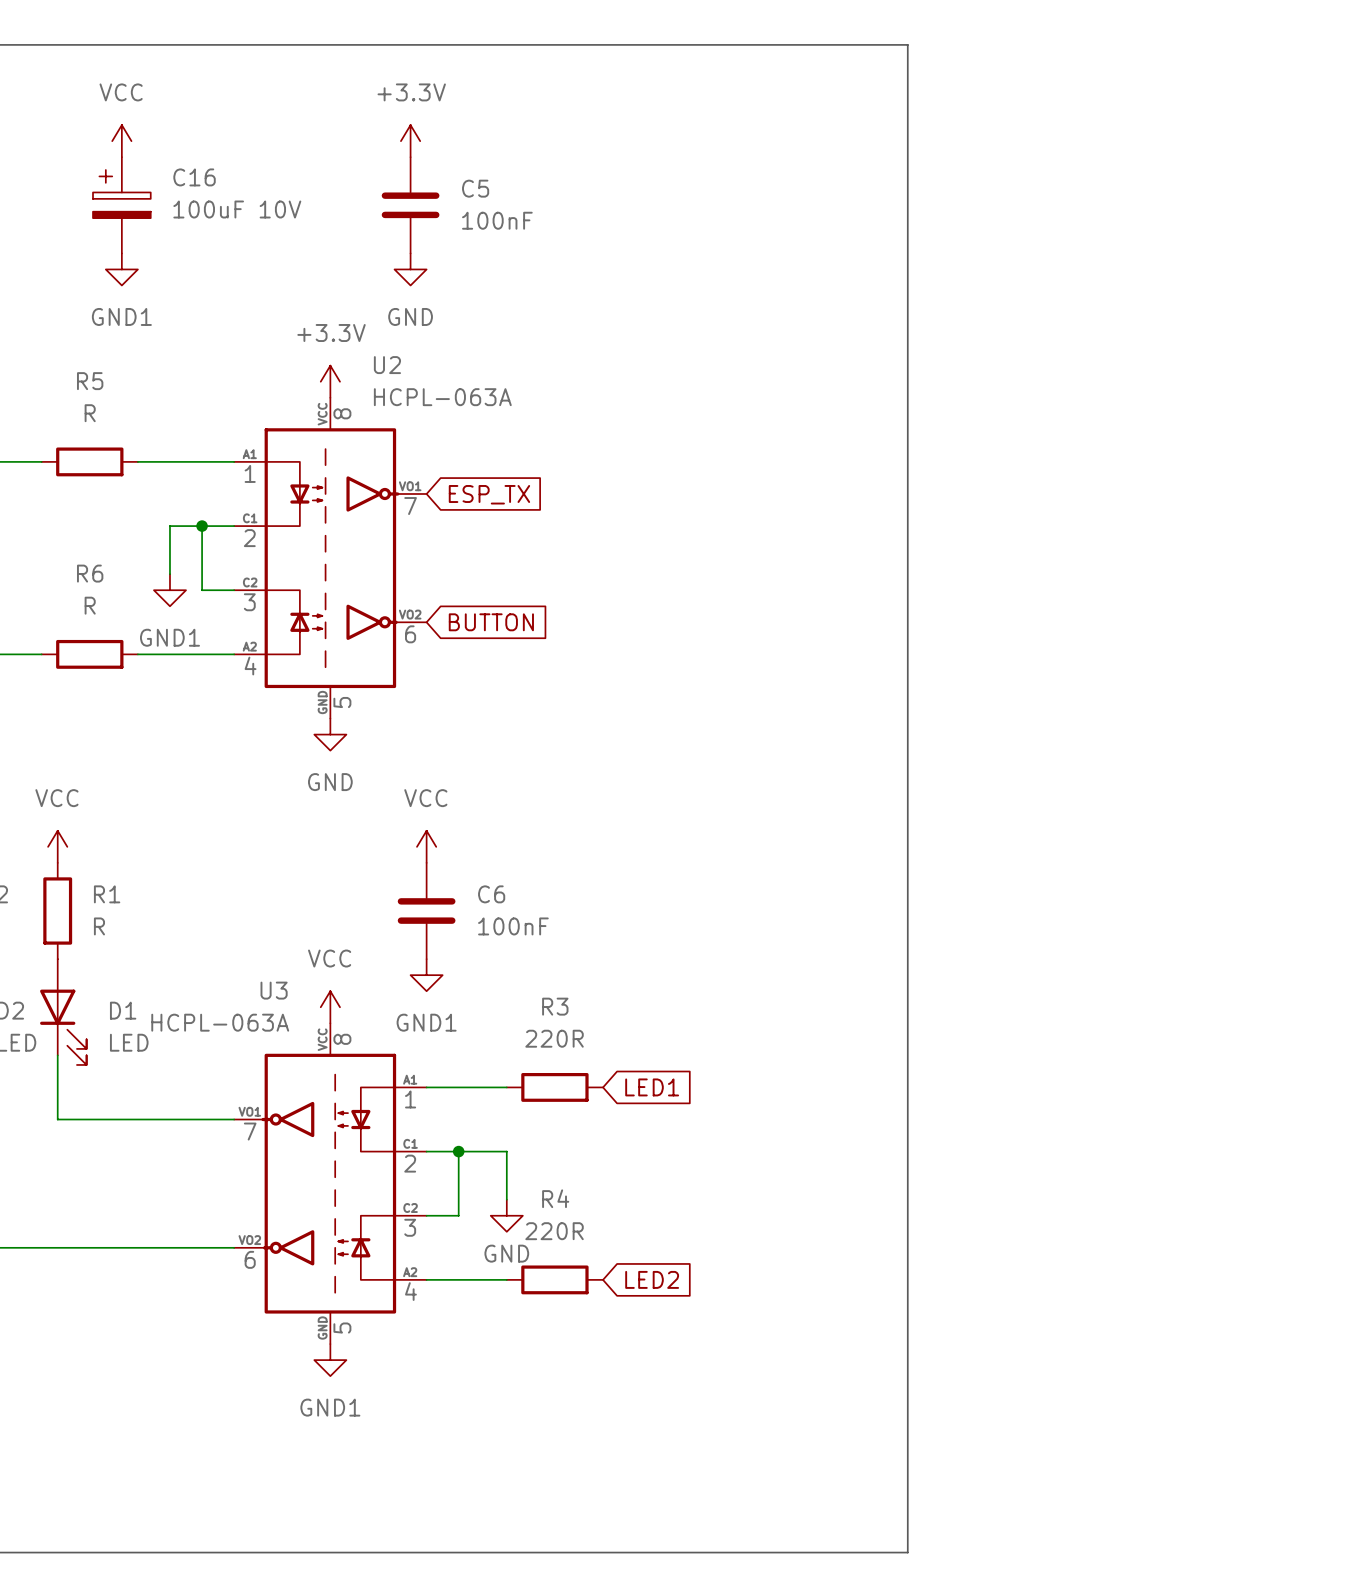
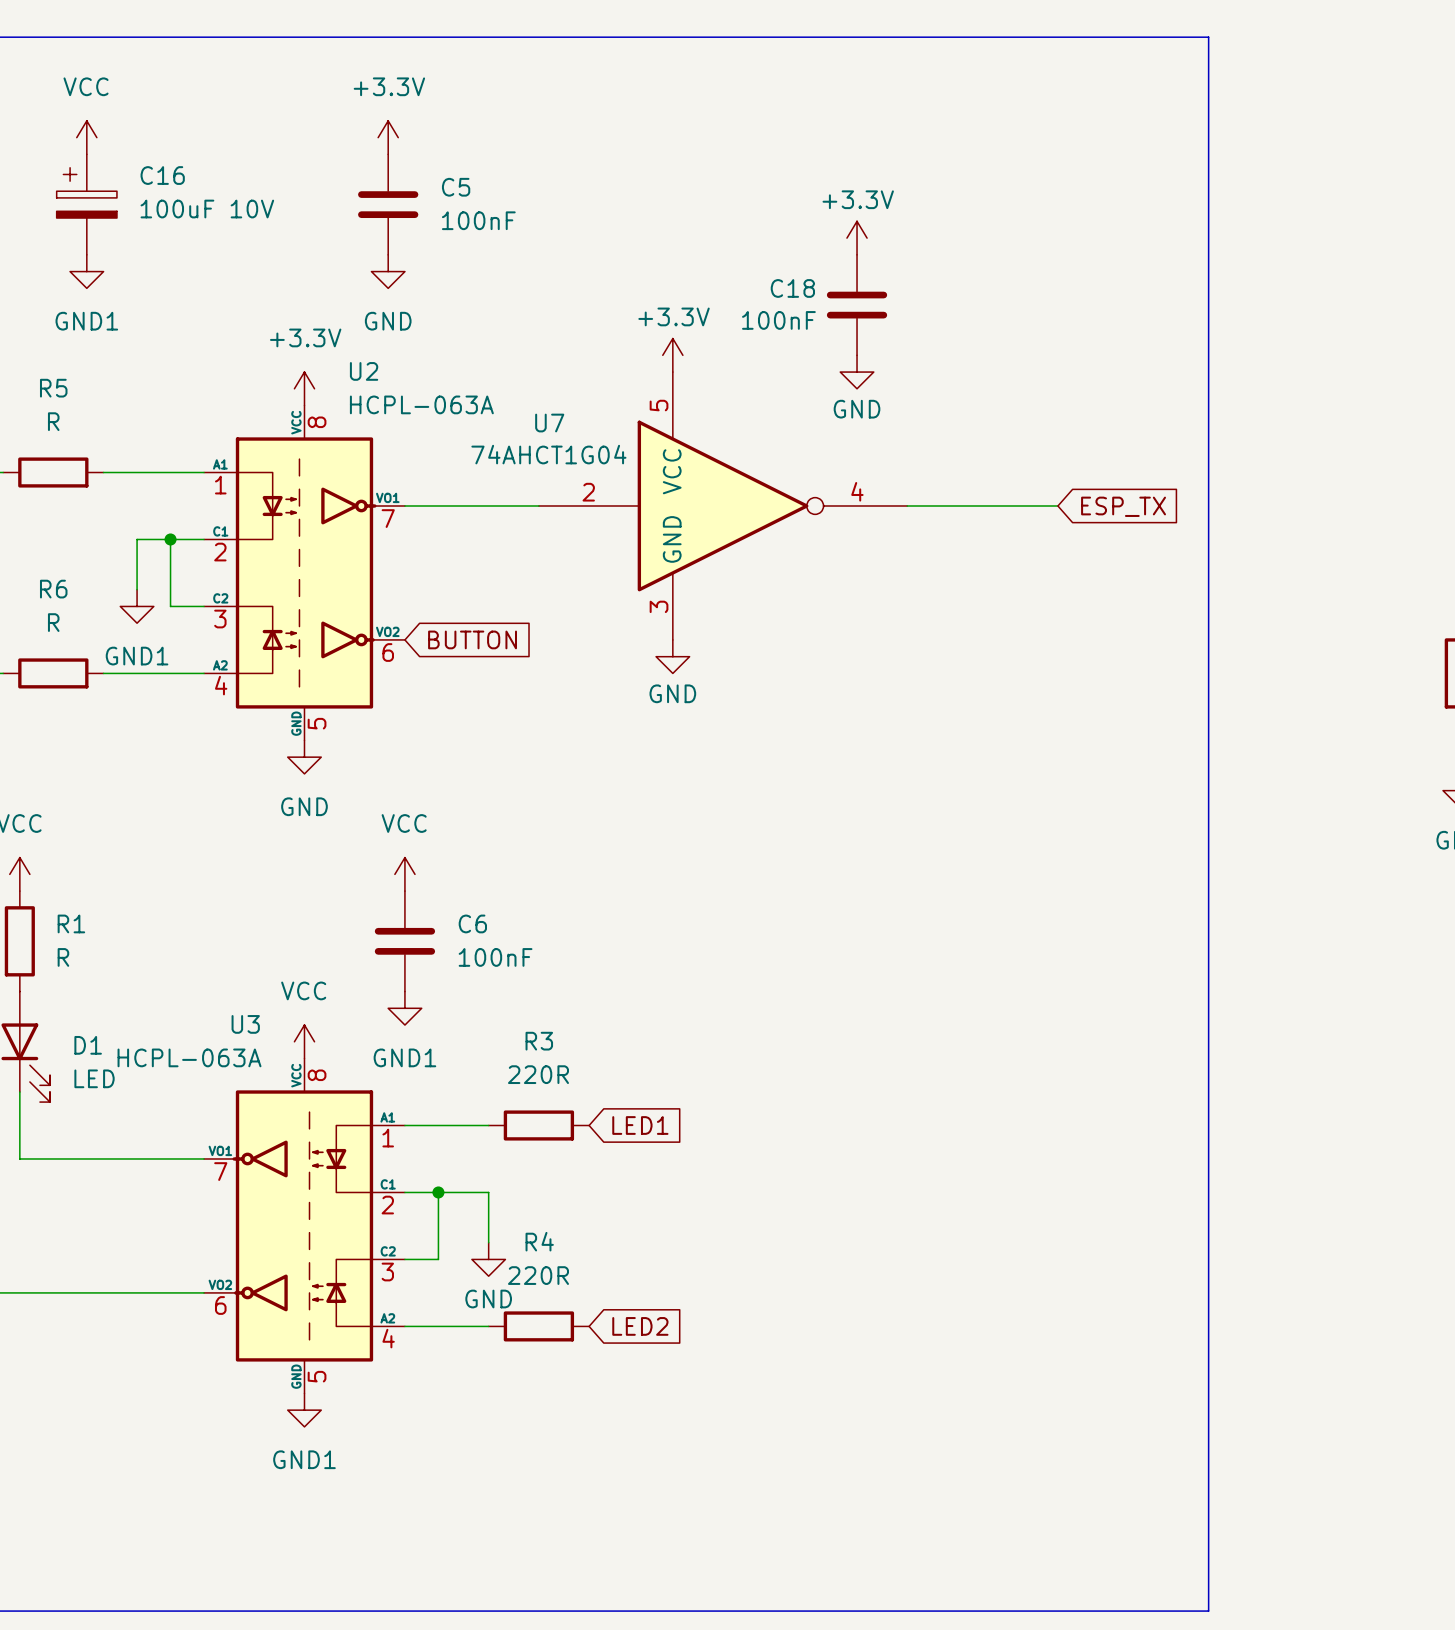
line: (907, 44) (907, 1552) -> (907, 37) (1208, 37) (1208, 1611) (907, 1611)
power symbol: none -> +3.3V (857, 238)
C18: none -> 100nF (857, 305)
power symbol: none -> +3.3V (672, 355)
power symbol: none -> GND (857, 372)
wire: none -> (404, 506) (538, 506)
U7: none -> 74AHCT1G04 (723, 506)
wire: none -> (907, 506) (1057, 506)
global label: ESP_TX (489, 494) -> none
global label: none -> ESP_TX (1123, 506)
power symbol: none -> GND (672, 656)

